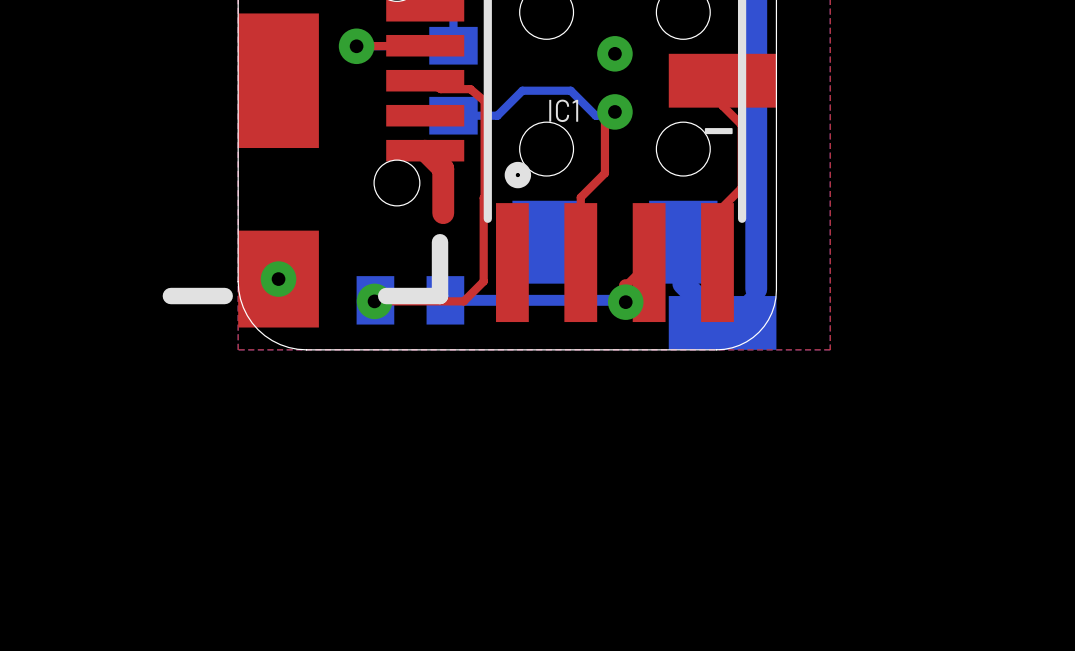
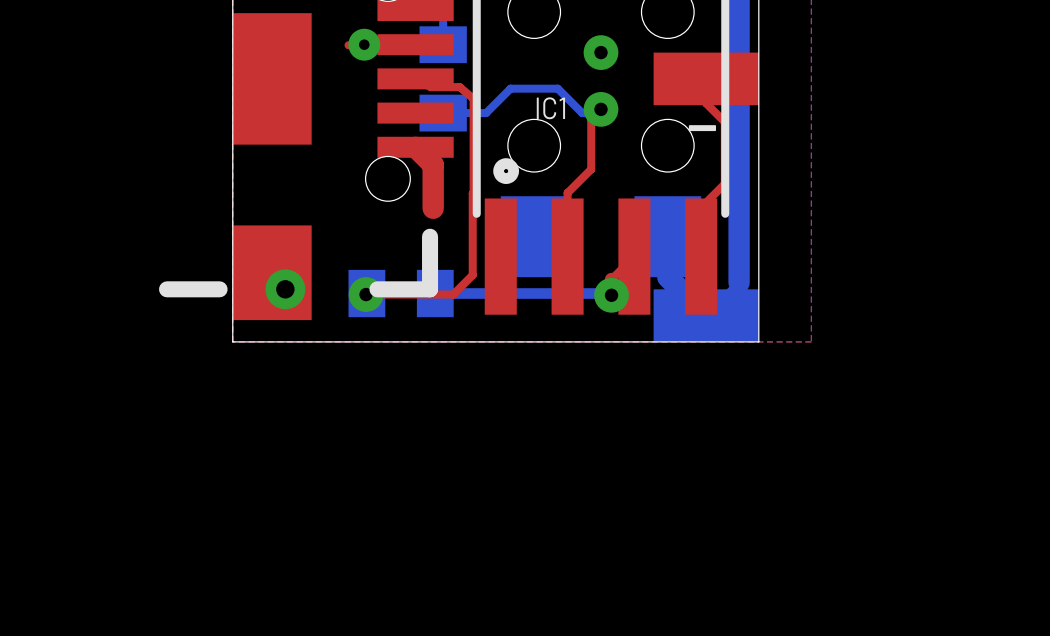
via position: (356, 46) -> (364, 44)
via position: (278, 279) -> (285, 289)
board edge: (238, 281) (243, 307) (258, 329) (280, 344) (306, 349) -> (232, 275) (232, 341) (299, 341)
board edge: (776, 290) (771, 312) (758, 332) (739, 345) (716, 349) -> (758, 283) (758, 341) (700, 341)

